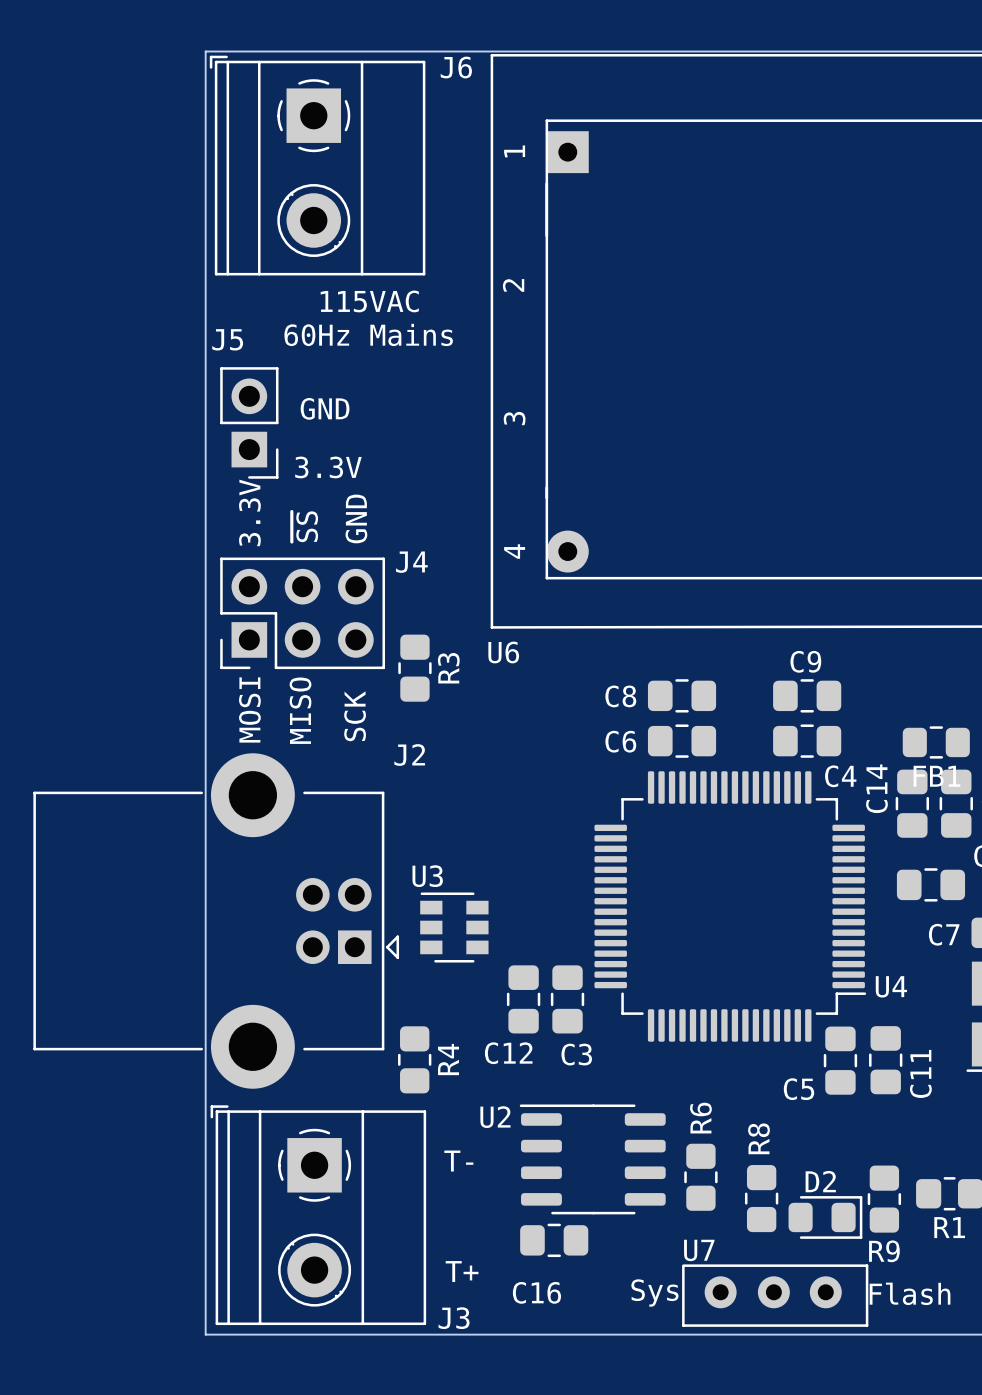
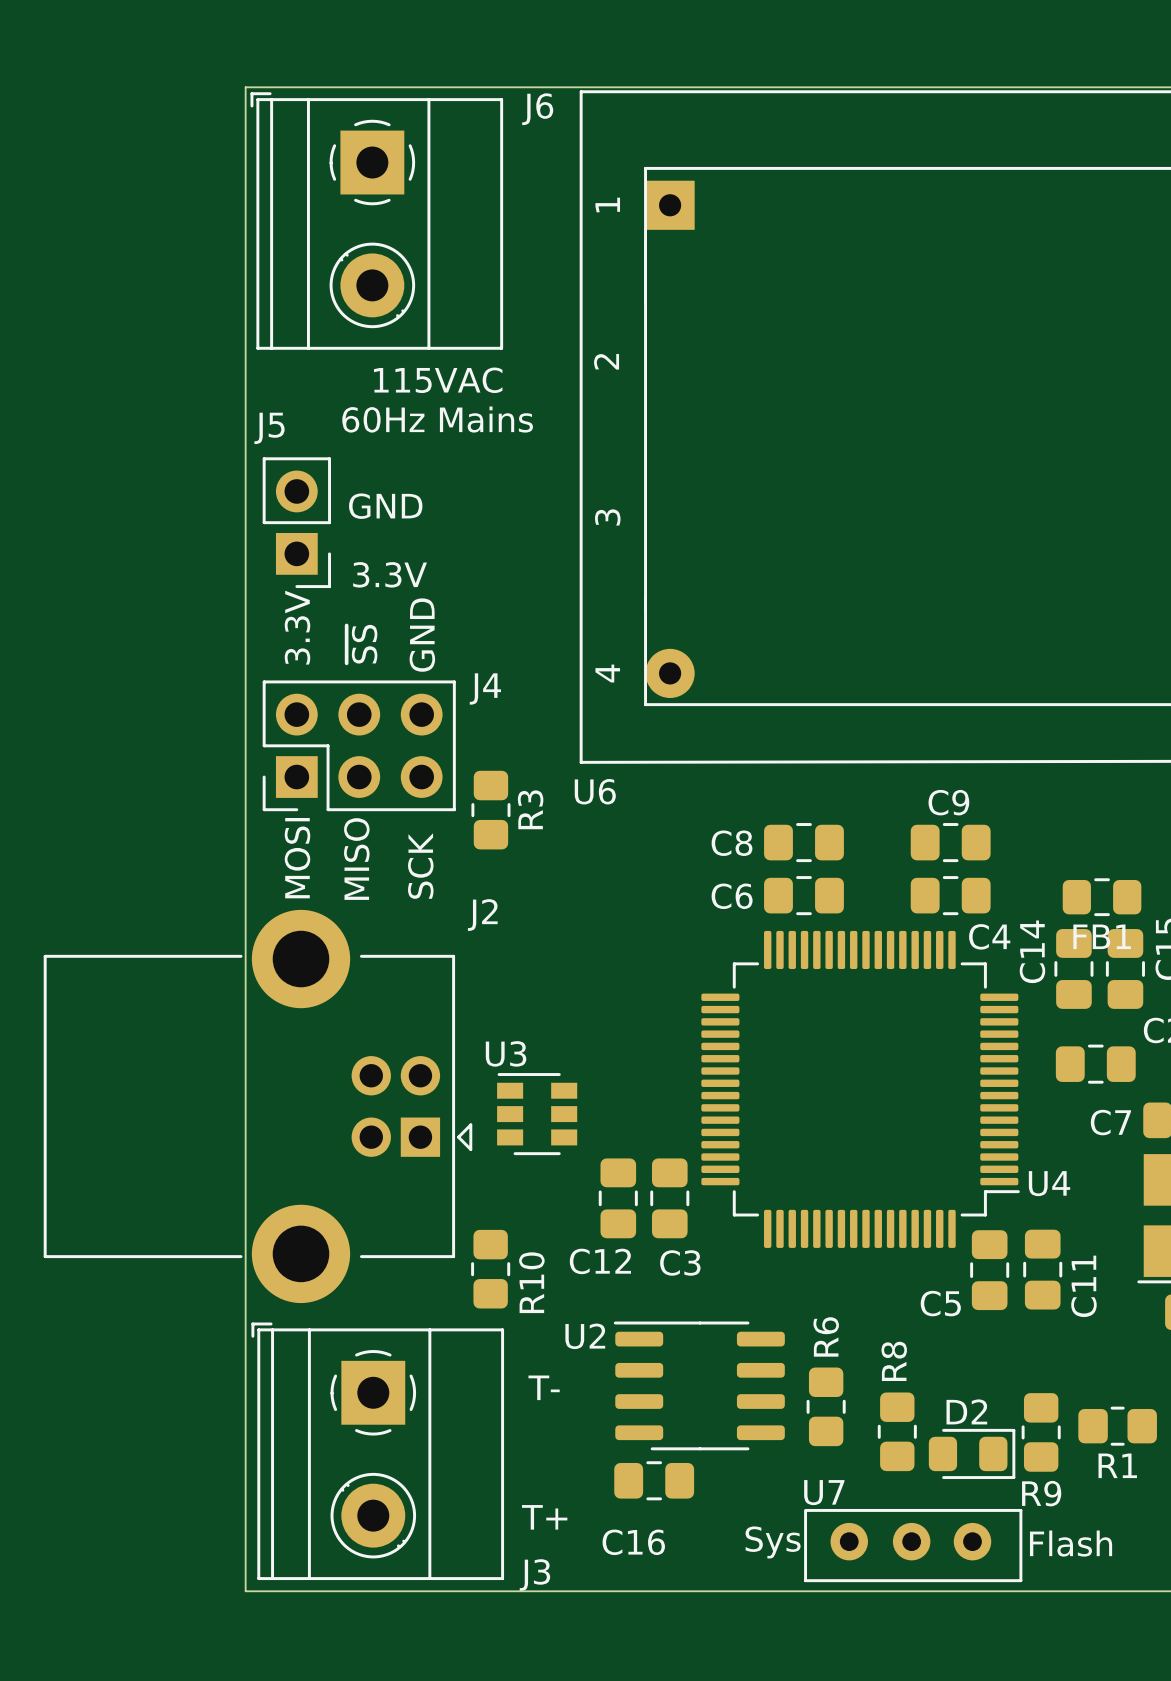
R4 name: R4 (448, 1059) -> R10 (531, 1282)

